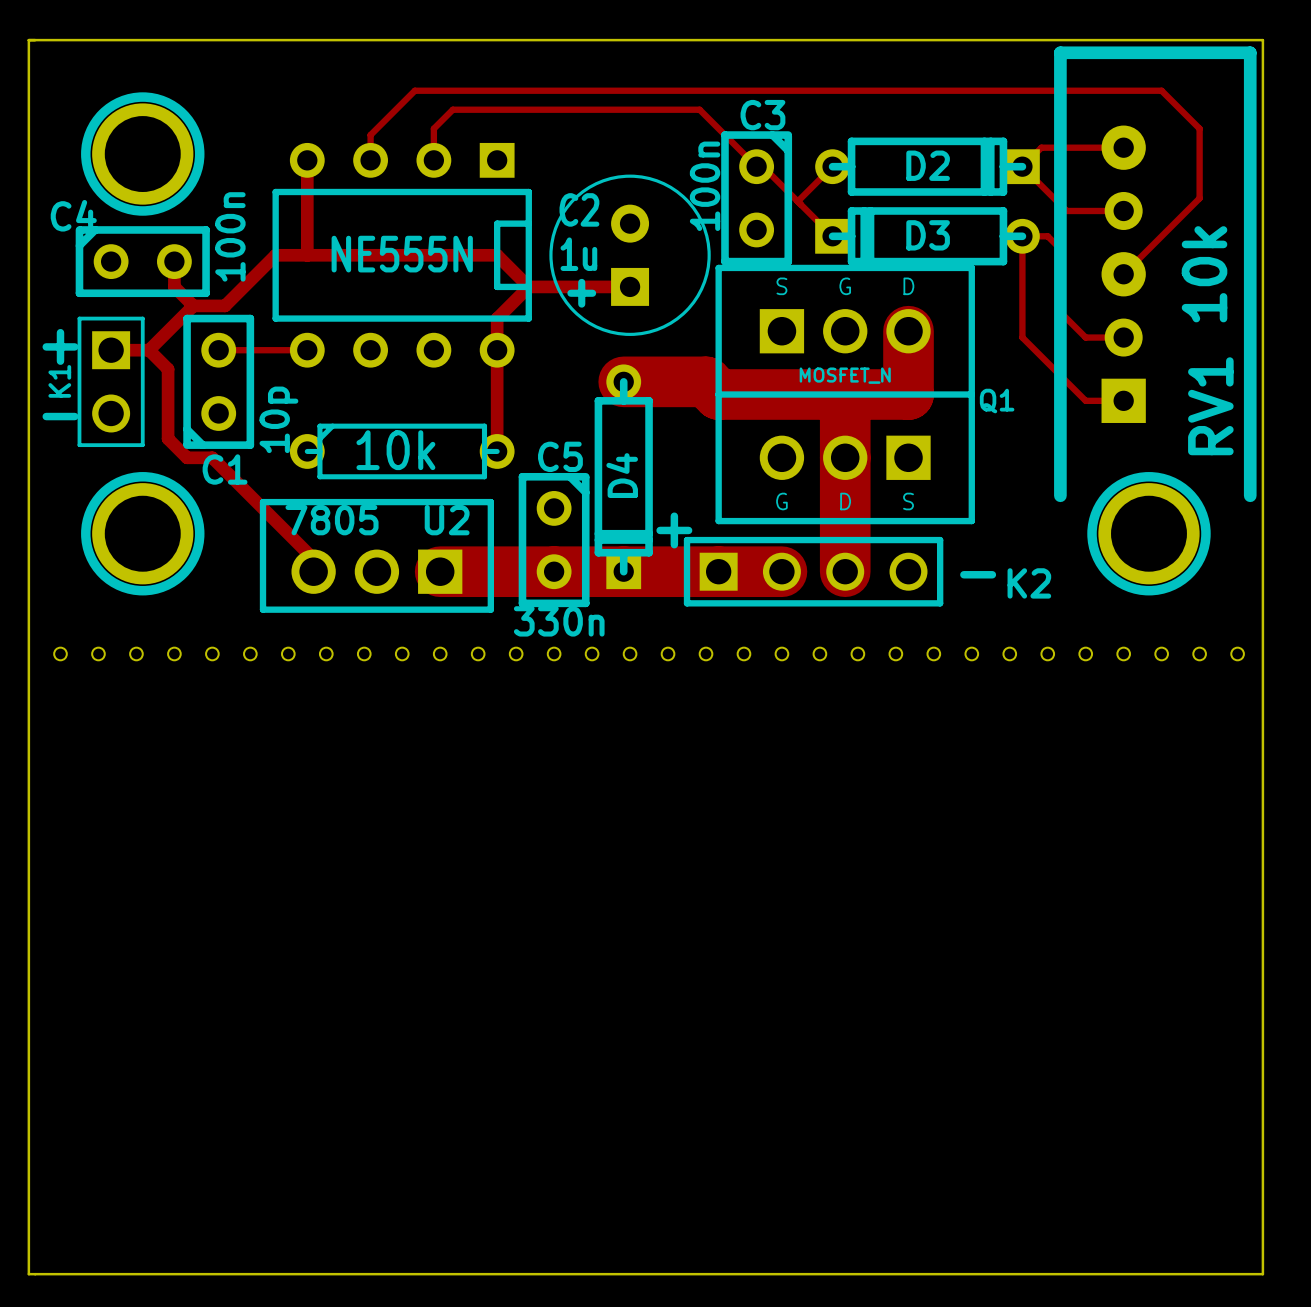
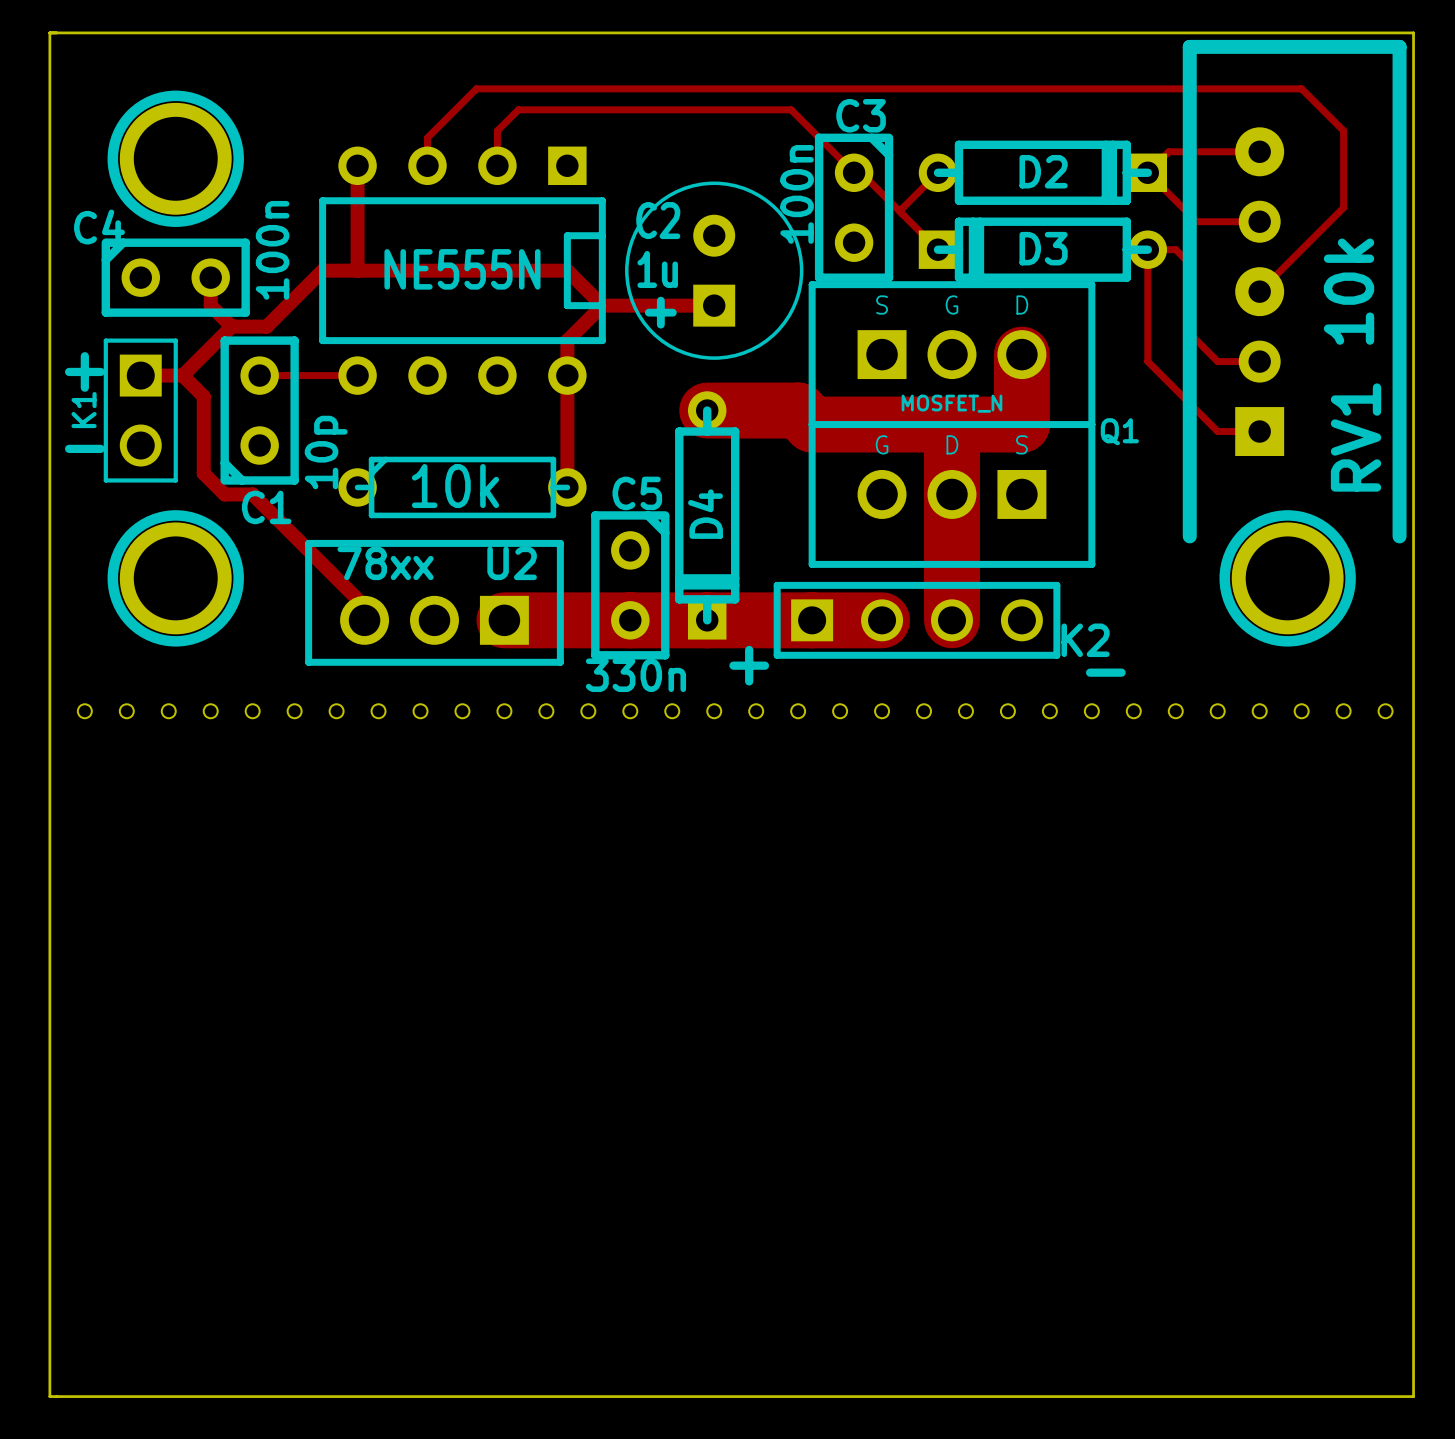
Q1 text position: G (781, 501) -> G (882, 444)
Q1 text position: D (845, 501) -> D (952, 444)
Q1 text position: S (908, 501) -> S (1021, 444)
U2 value: 7805 (332, 520) -> 78xx (385, 563)
text position: + (674, 530) -> + (749, 665)
text position: - (978, 574) -> - (1105, 672)
K2 name position: K2 (1029, 583) -> K2 (1085, 640)

